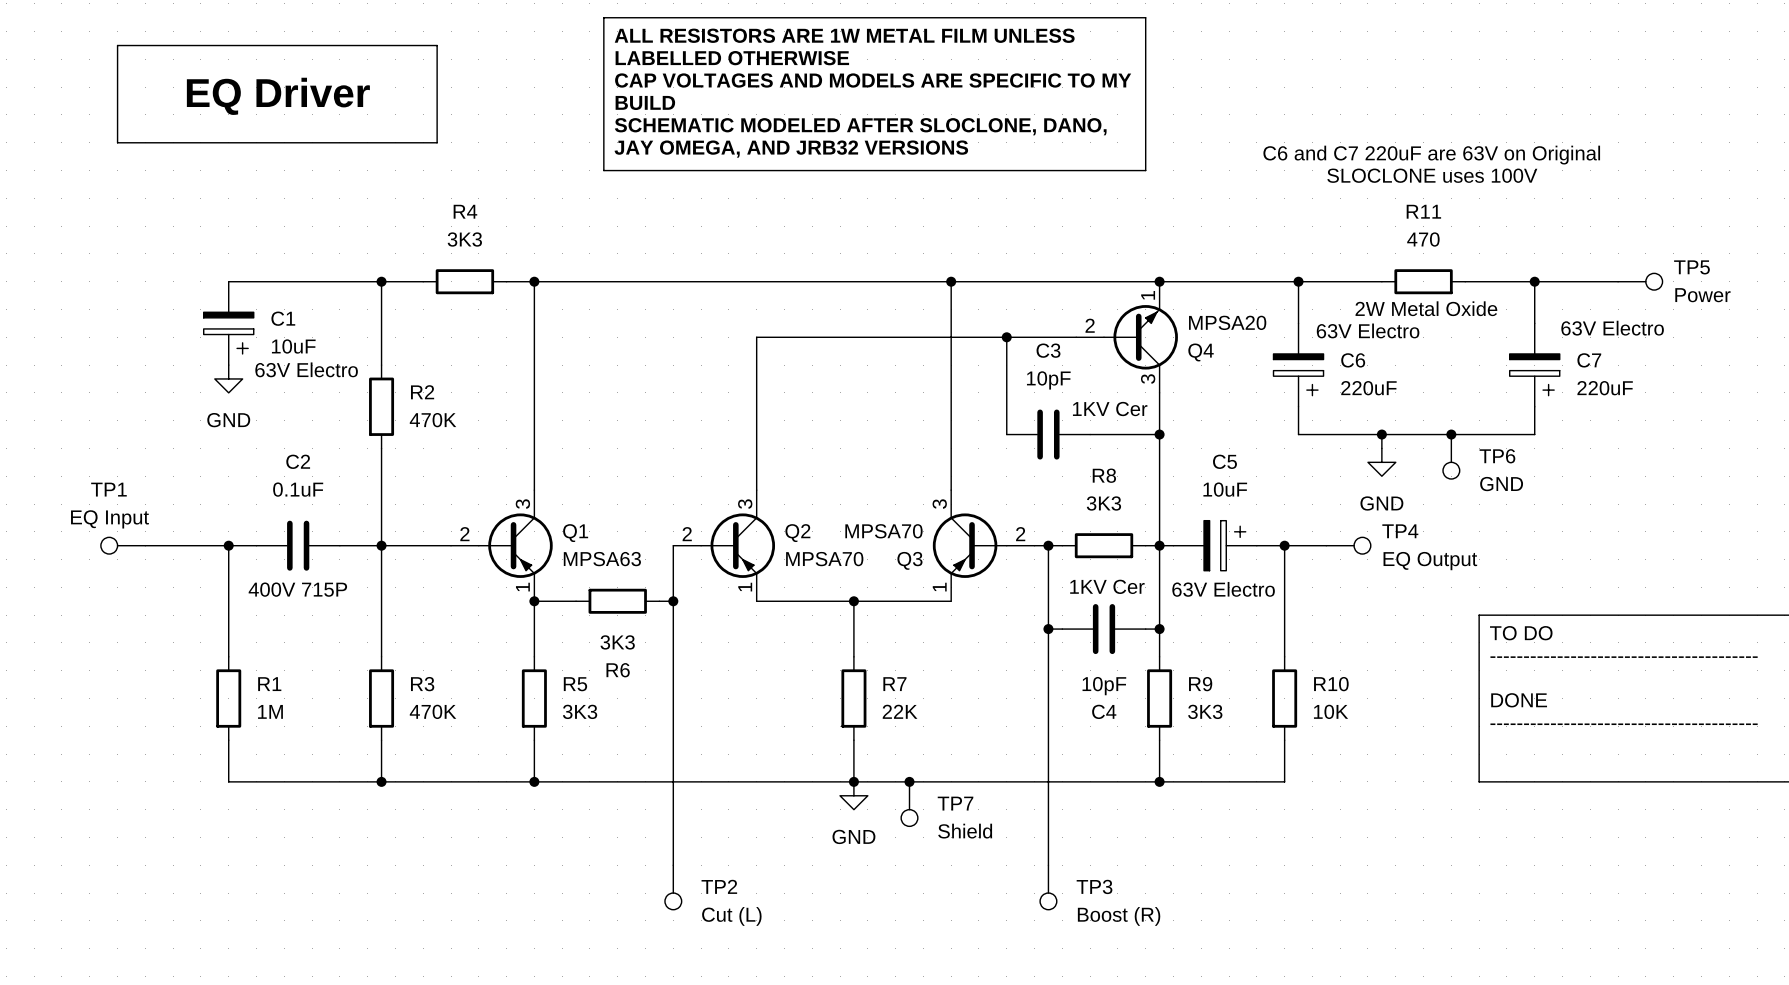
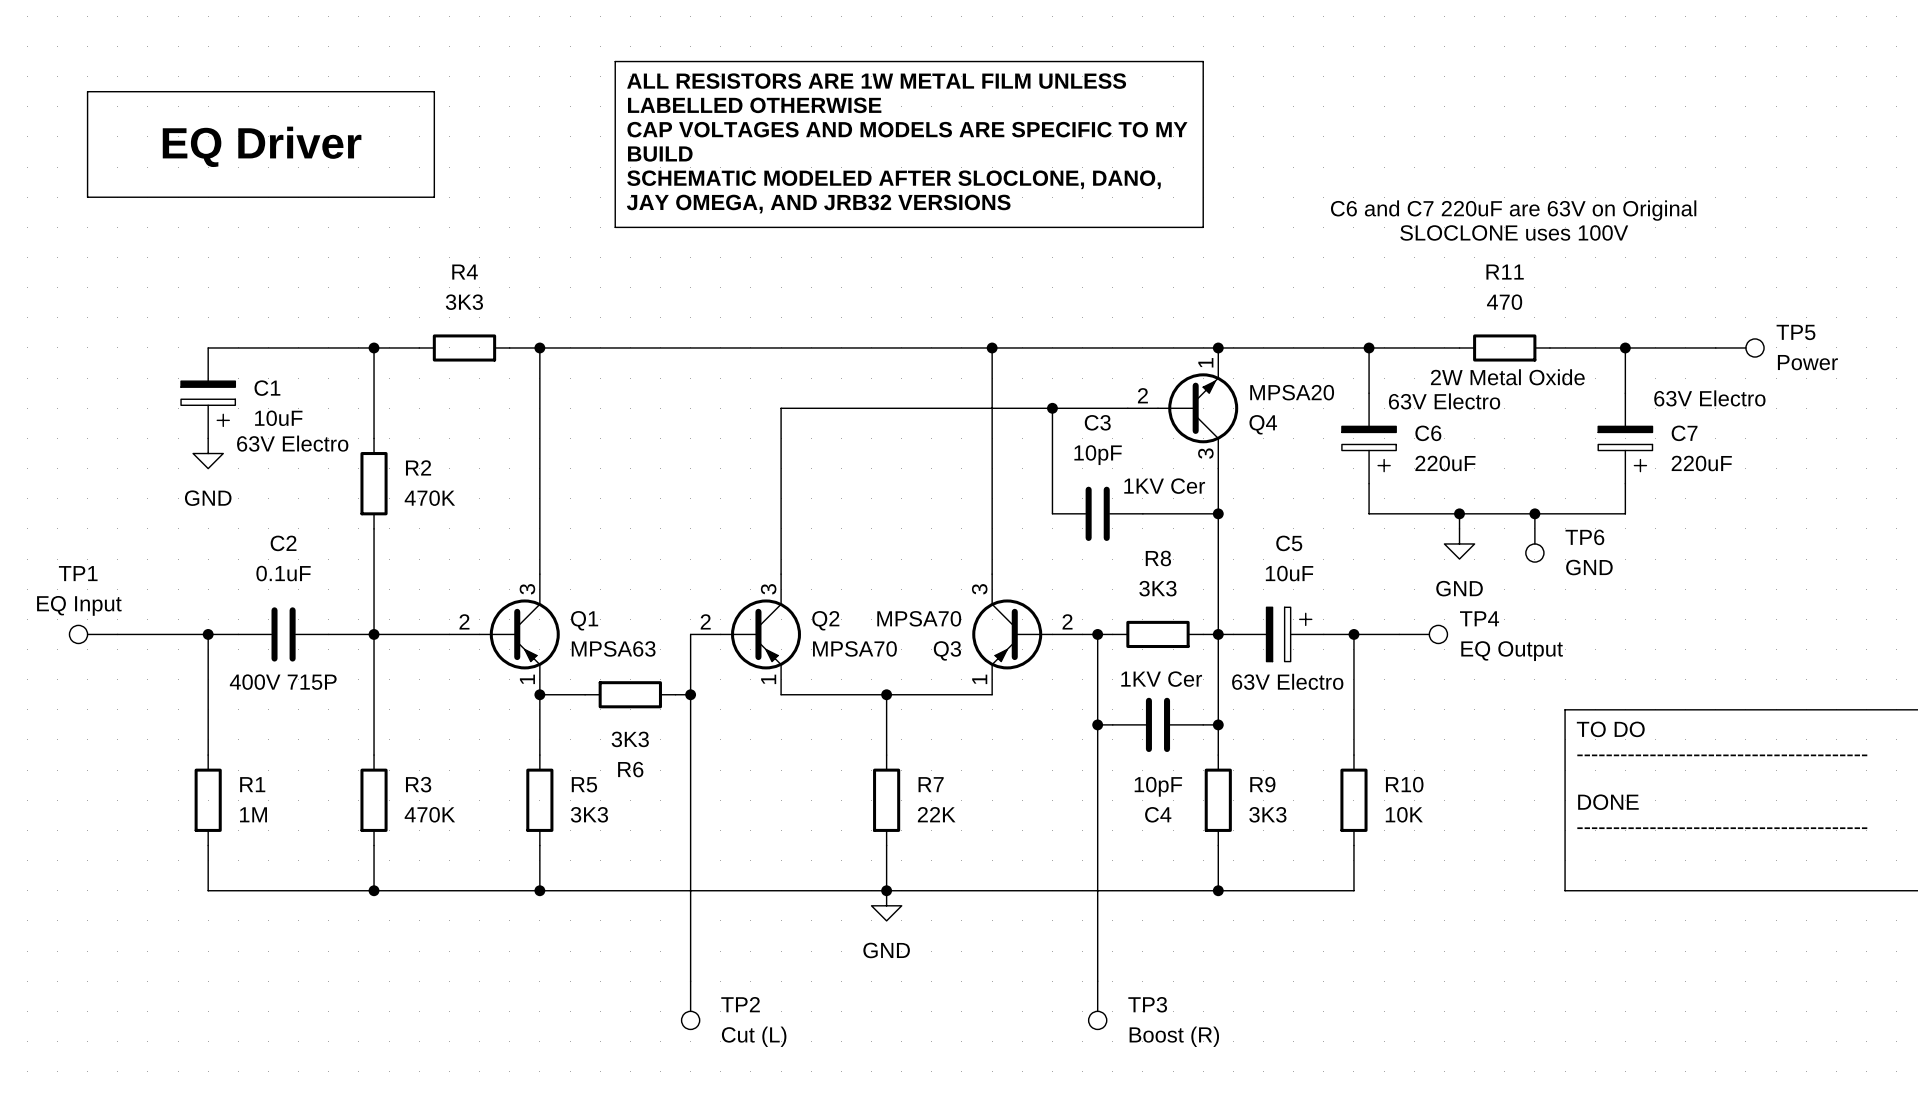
junction: (909, 781) -> none
TP7: Shield (909, 804) -> none

